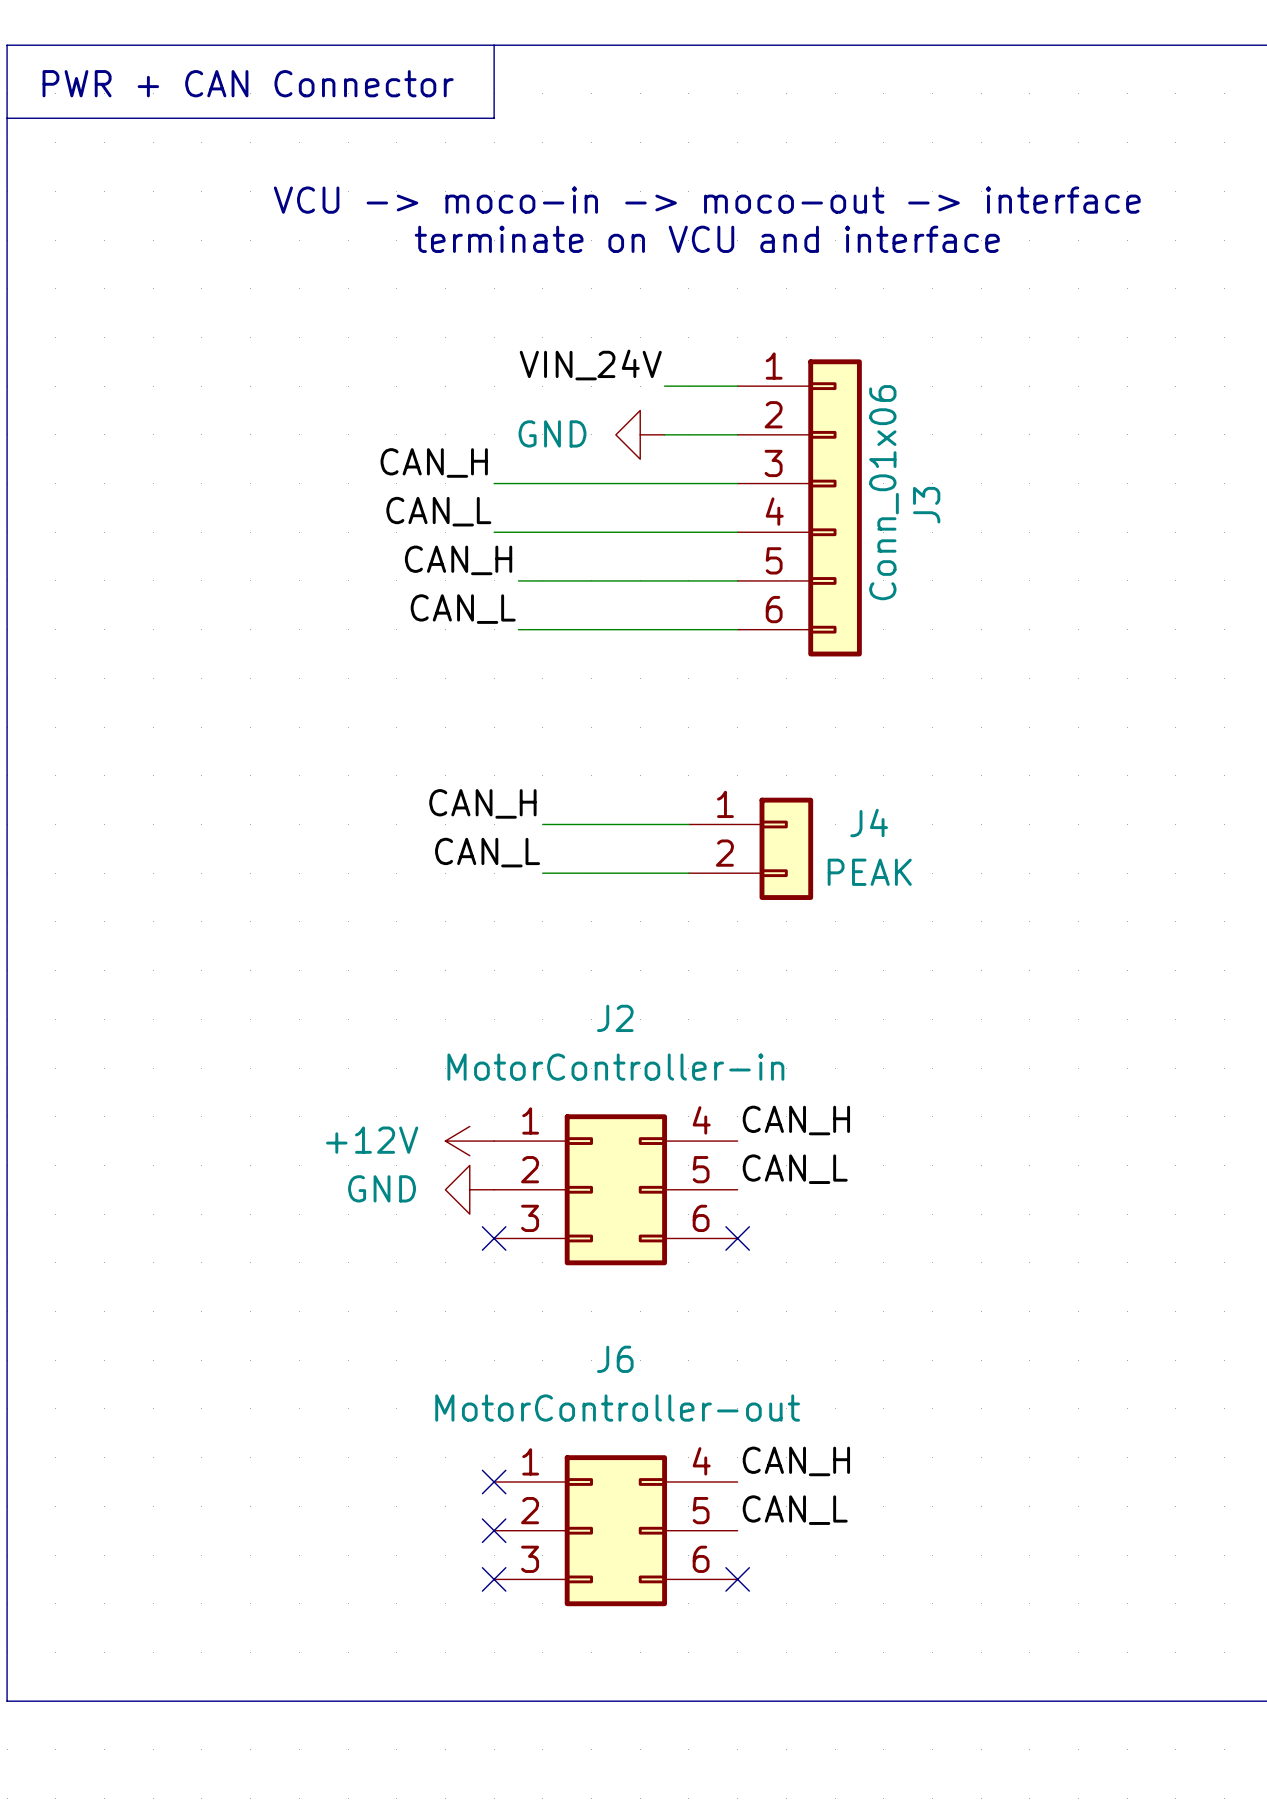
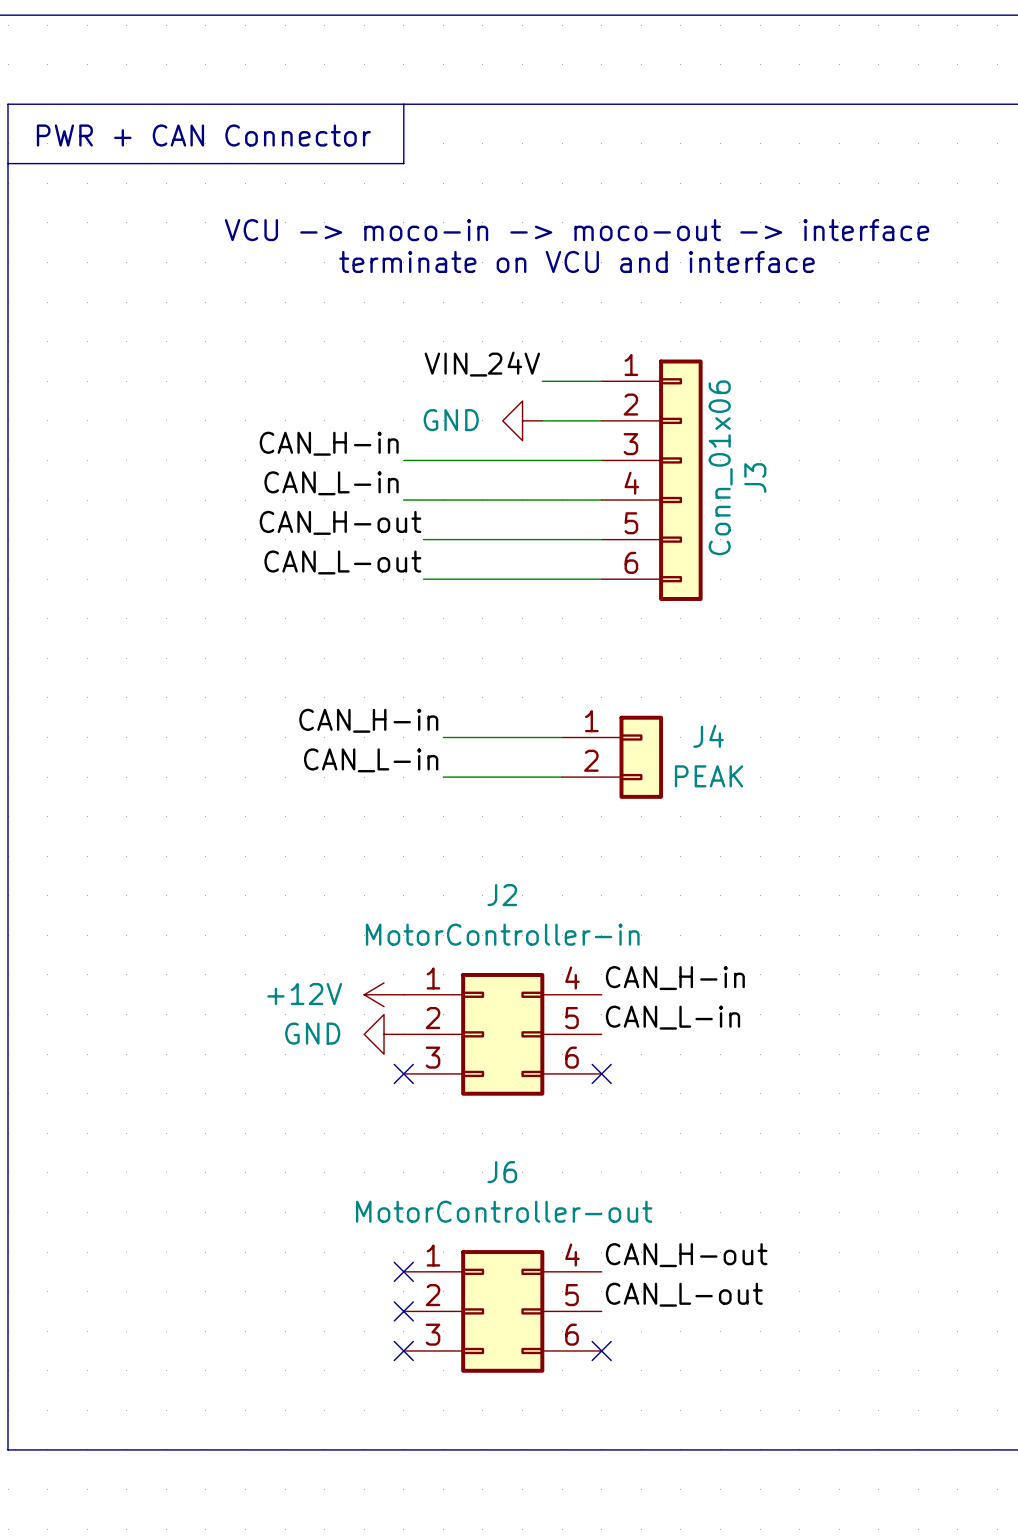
label: CAN_H (434, 462) -> CAN_H-in (329, 443)
label: CAN_L (438, 511) -> CAN_L-in (331, 483)
label: CAN_H (458, 560) -> CAN_H-out (340, 522)
label: CAN_L (463, 609) -> CAN_L-out (342, 562)
label: CAN_H (482, 803) -> CAN_H-in (368, 720)
label: CAN_L (487, 852) -> CAN_L-in (371, 760)
label: CAN_H (796, 1120) -> CAN_H-in (675, 978)
label: CAN_L (795, 1169) -> CAN_L-in (672, 1017)
label: CAN_H (796, 1461) -> CAN_H-out (686, 1255)
label: CAN_L (795, 1510) -> CAN_L-out (684, 1294)

